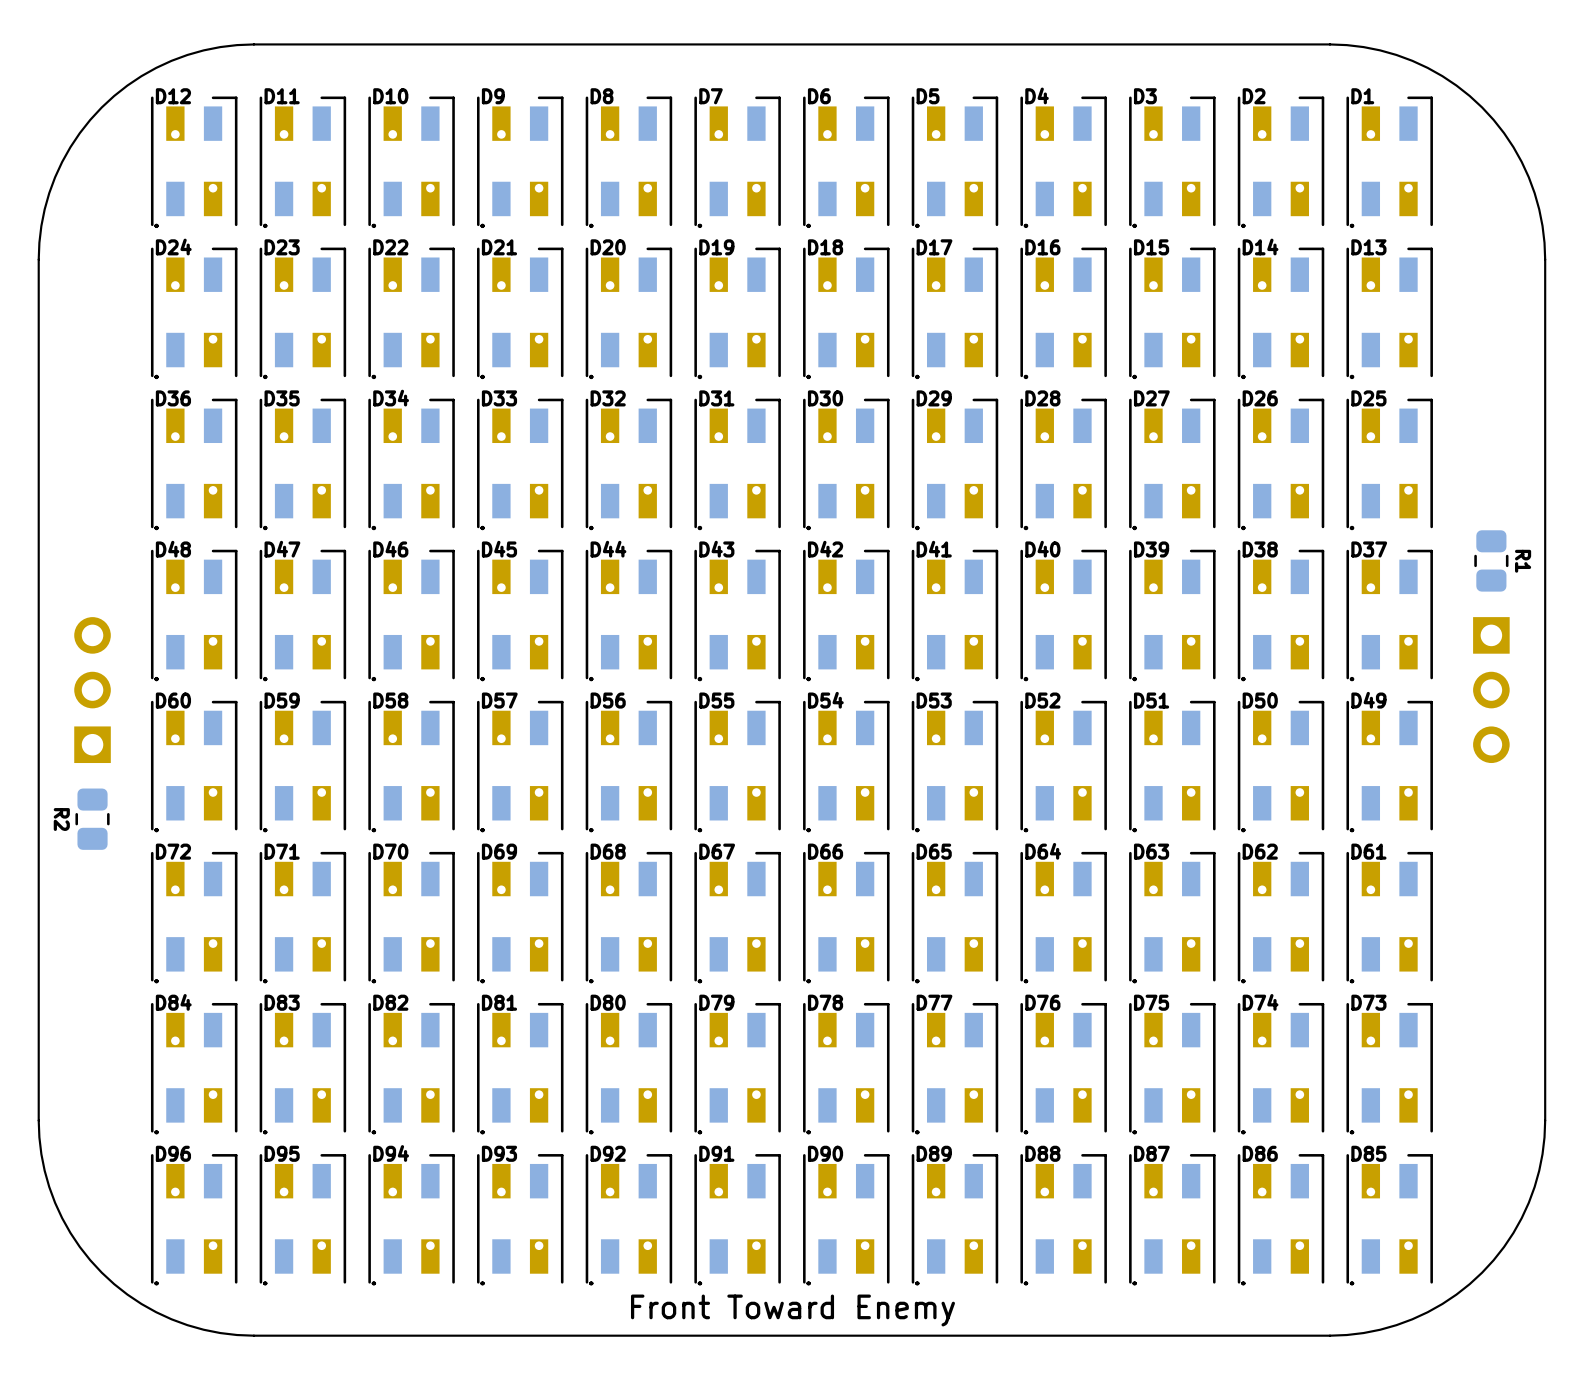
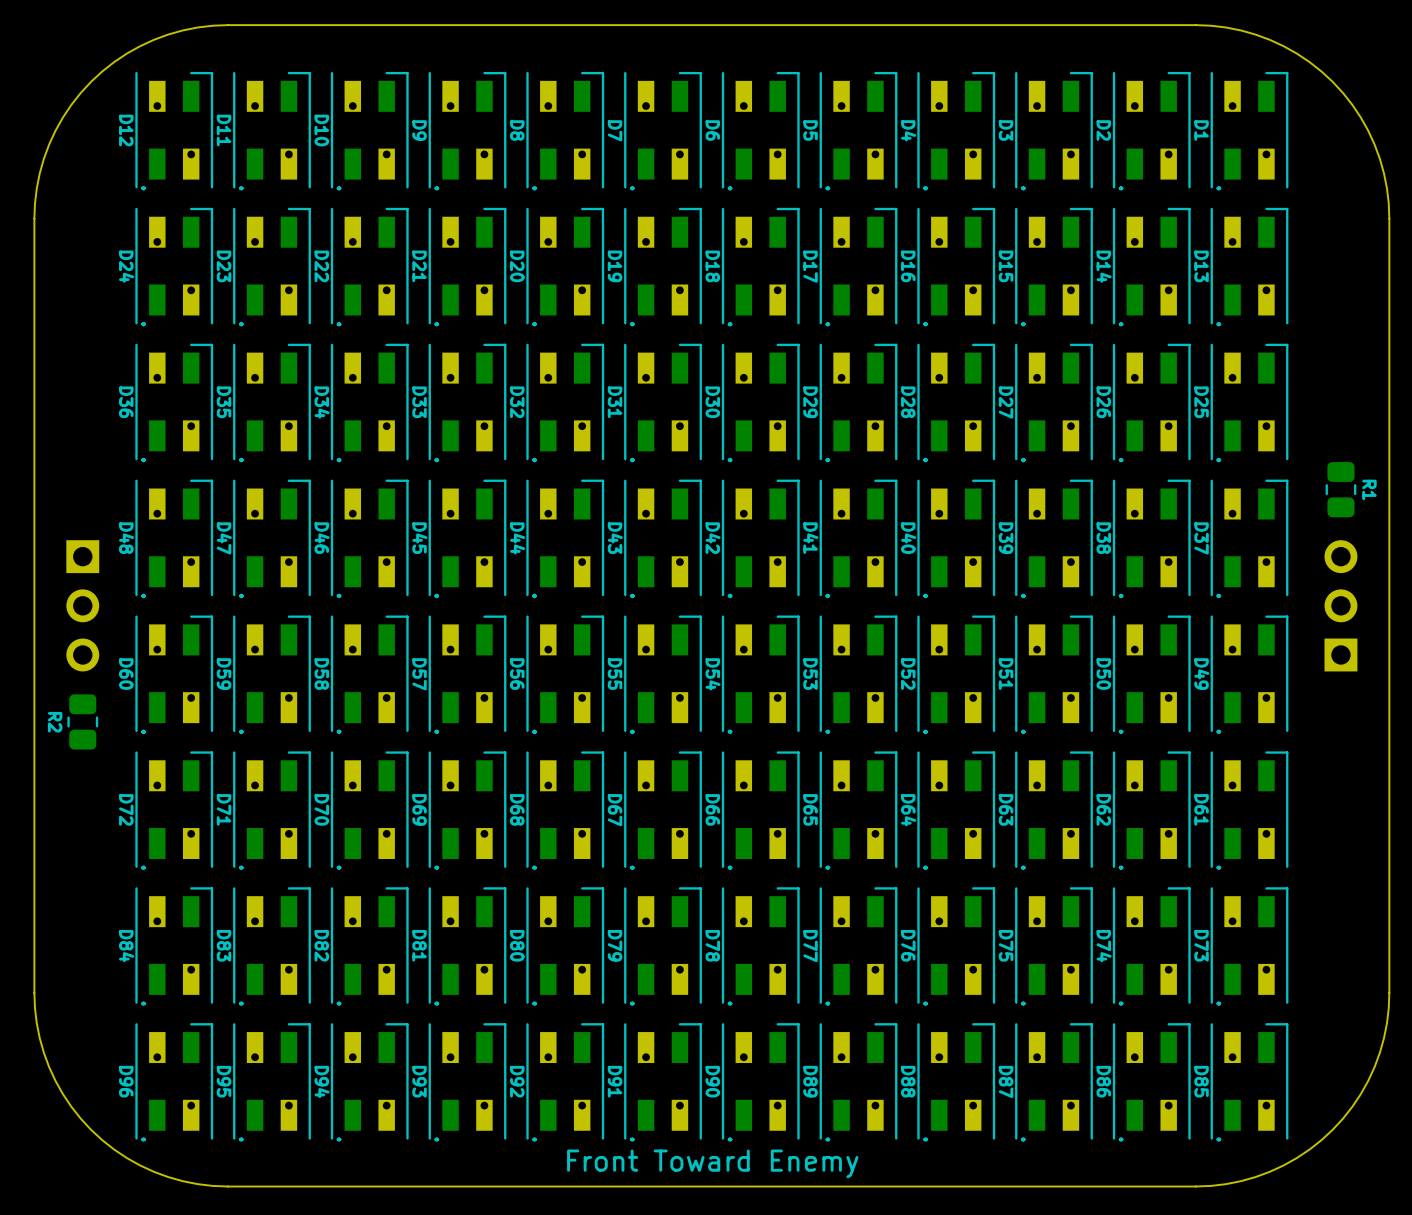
D4 name position: D4 (1037, 95) -> D4 (908, 130)
D12 footprint: [150, 96, 238, 227] -> [135, 71, 214, 189]
D12 name position: D12 (173, 96) -> D12 (126, 130)
D11 footprint: [259, 96, 347, 227] -> [233, 71, 311, 189]
D11 name position: D11 (282, 96) -> D11 (224, 130)
D10 footprint: [368, 96, 455, 227] -> [330, 71, 409, 189]
D10 name position: D10 (390, 96) -> D10 (321, 130)
D9 footprint: [476, 96, 564, 227] -> [428, 71, 507, 189]
D9 name position: D9 (493, 96) -> D9 (419, 130)
D8 footprint: [585, 96, 673, 227] -> [526, 71, 605, 189]
D8 name position: D8 (602, 96) -> D8 (517, 130)
D7 footprint: [694, 96, 781, 227] -> [624, 71, 702, 189]
D7 name position: D7 (710, 96) -> D7 (615, 130)
D6 footprint: [803, 96, 890, 227] -> [721, 71, 800, 189]
D6 name position: D6 (819, 96) -> D6 (712, 130)
D5 footprint: [911, 96, 999, 227] -> [819, 71, 898, 189]
D5 name position: D5 (928, 96) -> D5 (810, 130)
D4 footprint: [1020, 96, 1107, 227] -> [917, 71, 996, 189]
D3 footprint: [1129, 96, 1216, 227] -> [1015, 71, 1093, 189]
D3 name position: D3 (1145, 96) -> D3 (1006, 130)
D2 footprint: [1237, 96, 1325, 227] -> [1112, 71, 1191, 189]
D2 name position: D2 (1254, 96) -> D2 (1103, 130)
D1 footprint: [1346, 96, 1433, 227] -> [1210, 71, 1289, 189]
D1 name position: D1 (1362, 96) -> D1 (1201, 130)
D24 footprint: [150, 247, 238, 378] -> [135, 207, 214, 325]
D24 name position: D24 (173, 247) -> D24 (126, 266)
D23 footprint: [259, 247, 347, 378] -> [233, 207, 311, 325]
D23 name position: D23 (282, 247) -> D23 (224, 266)
D22 footprint: [368, 247, 455, 378] -> [330, 207, 409, 325]
D22 name position: D22 (390, 247) -> D22 (321, 266)
D21 footprint: [476, 247, 564, 378] -> [428, 207, 507, 325]
D21 name position: D21 (499, 247) -> D21 (419, 266)
D20 footprint: [585, 247, 673, 378] -> [526, 207, 605, 325]
D20 name position: D20 (608, 247) -> D20 (517, 266)
D19 footprint: [694, 247, 781, 378] -> [624, 207, 702, 325]
D19 name position: D19 (716, 247) -> D19 (615, 266)
D18 footprint: [803, 247, 890, 378] -> [721, 207, 800, 325]
D18 name position: D18 (825, 247) -> D18 (712, 266)
D17 footprint: [911, 247, 999, 378] -> [819, 207, 898, 325]
D17 name position: D17 (934, 247) -> D17 (810, 266)
D16 footprint: [1020, 247, 1107, 378] -> [917, 207, 996, 325]
D16 name position: D16 (1042, 247) -> D16 (908, 266)
D15 footprint: [1129, 247, 1216, 378] -> [1015, 207, 1093, 325]
D15 name position: D15 (1151, 247) -> D15 (1006, 266)
D14 footprint: [1237, 247, 1325, 378] -> [1112, 207, 1191, 325]
D14 name position: D14 (1260, 247) -> D14 (1104, 266)
D13 footprint: [1346, 247, 1433, 378] -> [1210, 207, 1289, 325]
D13 name position: D13 (1368, 247) -> D13 (1201, 266)
D36 footprint: [150, 398, 238, 529] -> [135, 343, 214, 461]
D36 name position: D36 (173, 398) -> D36 (126, 402)
D35 footprint: [259, 398, 347, 529] -> [233, 343, 311, 461]
D35 name position: D35 (282, 398) -> D35 (224, 402)
D34 footprint: [368, 398, 455, 529] -> [330, 343, 409, 461]
D34 name position: D34 (391, 398) -> D34 (322, 402)
D33 footprint: [476, 398, 564, 529] -> [428, 343, 507, 461]
D33 name position: D33 (499, 398) -> D33 (419, 402)
D32 footprint: [585, 398, 673, 529] -> [526, 343, 605, 461]
D32 name position: D32 (608, 398) -> D32 (517, 402)
D31 footprint: [694, 398, 781, 529] -> [624, 343, 702, 461]
D31 name position: D31 (716, 398) -> D31 (615, 402)
D30 footprint: [803, 398, 890, 529] -> [721, 343, 800, 461]
D30 name position: D30 (825, 398) -> D30 (712, 402)
D29 footprint: [911, 398, 999, 529] -> [819, 343, 898, 461]
D29 name position: D29 (934, 398) -> D29 (810, 402)
D28 footprint: [1020, 398, 1107, 529] -> [917, 343, 996, 461]
D28 name position: D28 (1042, 398) -> D28 (908, 402)
D27 footprint: [1129, 398, 1216, 529] -> [1015, 343, 1093, 461]
D27 name position: D27 (1151, 398) -> D27 (1006, 402)
D26 footprint: [1237, 398, 1325, 529] -> [1112, 343, 1191, 461]
D26 name position: D26 (1260, 398) -> D26 (1103, 402)
D25 footprint: [1346, 398, 1433, 529] -> [1210, 343, 1289, 461]
D25 name position: D25 (1368, 398) -> D25 (1201, 402)
D48 footprint: [150, 549, 238, 680] -> [135, 479, 214, 597]
D48 name position: D48 (173, 549) -> D48 (126, 538)
D47 footprint: [259, 549, 347, 680] -> [233, 479, 311, 597]
D47 name position: D47 (282, 549) -> D47 (224, 538)
D46 footprint: [368, 549, 455, 680] -> [330, 479, 409, 597]
D46 name position: D46 (390, 549) -> D46 (322, 538)
D45 footprint: [476, 549, 564, 680] -> [428, 479, 507, 597]
D45 name position: D45 (499, 549) -> D45 (419, 538)
D44 footprint: [585, 549, 673, 680] -> [526, 479, 605, 597]
D44 name position: D44 (608, 549) -> D44 (517, 538)
D43 footprint: [694, 549, 781, 680] -> [624, 479, 702, 597]
D43 name position: D43 (716, 549) -> D43 (615, 538)
D42 footprint: [803, 549, 890, 680] -> [721, 479, 800, 597]
D42 name position: D42 (825, 549) -> D42 (713, 538)
D41 footprint: [911, 549, 999, 680] -> [819, 479, 898, 597]
D41 name position: D41 (934, 549) -> D41 (810, 538)
D40 footprint: [1020, 549, 1107, 680] -> [917, 479, 996, 597]
D40 name position: D40 (1042, 549) -> D40 (908, 538)
D39 footprint: [1129, 549, 1216, 680] -> [1015, 479, 1093, 597]
D39 name position: D39 (1151, 549) -> D39 (1006, 538)
D38 footprint: [1237, 549, 1325, 680] -> [1112, 479, 1191, 597]
D38 name position: D38 (1260, 549) -> D38 (1103, 538)
D37 footprint: [1346, 549, 1433, 680] -> [1210, 479, 1289, 597]
D37 name position: D37 (1369, 549) -> D37 (1201, 538)
part rotation: 0° (92, 690) -> 180° (82, 605)
part rotation: 0° (1491, 690) -> 180° (1340, 605)
D60 footprint: [150, 700, 238, 831] -> [135, 615, 214, 733]
D60 name position: D60 (173, 700) -> D60 (126, 674)
D59 footprint: [259, 700, 347, 831] -> [233, 615, 311, 733]
D59 name position: D59 (282, 700) -> D59 (224, 674)
D58 footprint: [368, 700, 455, 831] -> [330, 615, 409, 733]
D58 name position: D58 (390, 700) -> D58 (321, 674)
D57 footprint: [476, 700, 564, 831] -> [428, 615, 507, 733]
D57 name position: D57 (499, 700) -> D57 (419, 674)
D56 footprint: [585, 700, 673, 831] -> [526, 615, 605, 733]
D56 name position: D56 (608, 700) -> D56 (517, 674)
D55 footprint: [694, 700, 781, 831] -> [624, 615, 702, 733]
D55 name position: D55 (716, 700) -> D55 (615, 674)
D54 footprint: [803, 700, 890, 831] -> [721, 615, 800, 733]
D54 name position: D54 (825, 700) -> D54 (713, 674)
D53 footprint: [911, 700, 999, 831] -> [819, 615, 898, 733]
D53 name position: D53 (934, 700) -> D53 (810, 674)
D52 footprint: [1020, 700, 1107, 831] -> [917, 615, 996, 733]
D52 name position: D52 (1042, 700) -> D52 (908, 674)
D51 footprint: [1129, 700, 1216, 831] -> [1015, 615, 1093, 733]
D51 name position: D51 (1151, 700) -> D51 (1006, 674)
D50 footprint: [1237, 700, 1325, 831] -> [1112, 615, 1191, 733]
D50 name position: D50 (1260, 700) -> D50 (1103, 674)
D49 footprint: [1346, 700, 1433, 831] -> [1210, 615, 1289, 733]
D49 name position: D49 (1368, 700) -> D49 (1201, 674)
D72 footprint: [150, 851, 238, 982] -> [135, 751, 214, 868]
D72 name position: D72 (173, 851) -> D72 (126, 809)
D71 footprint: [259, 851, 347, 982] -> [233, 751, 311, 868]
D71 name position: D71 (282, 851) -> D71 (224, 809)
D70 footprint: [368, 851, 455, 982] -> [330, 751, 409, 868]
D70 name position: D70 (390, 851) -> D70 (321, 809)
D69 footprint: [476, 851, 564, 982] -> [428, 751, 507, 868]
D69 name position: D69 (499, 851) -> D69 (419, 809)
D68 footprint: [585, 851, 673, 982] -> [526, 751, 605, 868]
D68 name position: D68 (608, 851) -> D68 (517, 809)
D67 footprint: [694, 851, 781, 982] -> [624, 751, 702, 868]
D67 name position: D67 (717, 851) -> D67 (615, 810)
D66 footprint: [803, 851, 890, 982] -> [721, 751, 800, 868]
D66 name position: D66 (825, 851) -> D66 (712, 809)
D65 footprint: [911, 851, 999, 982] -> [819, 751, 898, 868]
D65 name position: D65 (934, 851) -> D65 (810, 809)
D64 footprint: [1020, 851, 1107, 982] -> [917, 751, 996, 868]
D64 name position: D64 (1043, 851) -> D64 (908, 810)
D63 footprint: [1129, 851, 1216, 982] -> [1015, 751, 1093, 868]
D63 name position: D63 (1151, 851) -> D63 (1006, 809)
D62 footprint: [1237, 851, 1325, 982] -> [1112, 751, 1191, 868]
D62 name position: D62 (1260, 851) -> D62 (1103, 809)
D61 footprint: [1346, 851, 1433, 982] -> [1210, 751, 1289, 868]
D61 name position: D61 (1368, 851) -> D61 (1201, 809)
D84 footprint: [150, 1002, 238, 1133] -> [135, 887, 214, 1004]
D84 name position: D84 (173, 1002) -> D84 (126, 946)
D83 footprint: [259, 1002, 347, 1133] -> [233, 887, 311, 1004]
D83 name position: D83 (282, 1002) -> D83 (224, 945)
D82 footprint: [368, 1002, 455, 1133] -> [330, 887, 409, 1004]
D82 name position: D82 (390, 1002) -> D82 (321, 945)
D81 footprint: [476, 1002, 564, 1133] -> [428, 887, 507, 1004]
D81 name position: D81 (499, 1002) -> D81 (419, 945)
D80 footprint: [585, 1002, 673, 1133] -> [526, 887, 605, 1004]
D80 name position: D80 (608, 1002) -> D80 (517, 945)
D79 footprint: [694, 1002, 781, 1133] -> [624, 887, 702, 1004]
D79 name position: D79 (716, 1002) -> D79 (615, 945)
D78 footprint: [803, 1002, 890, 1133] -> [721, 887, 800, 1004]
D78 name position: D78 (825, 1002) -> D78 (712, 945)
D77 footprint: [911, 1002, 999, 1133] -> [819, 887, 898, 1004]
D77 name position: D77 (934, 1002) -> D77 (810, 946)
D76 footprint: [1020, 1002, 1107, 1133] -> [917, 887, 996, 1004]
D76 name position: D76 (1042, 1002) -> D76 (908, 945)
D75 footprint: [1129, 1002, 1216, 1133] -> [1015, 887, 1093, 1004]
D75 name position: D75 (1151, 1002) -> D75 (1006, 945)
D74 footprint: [1237, 1002, 1325, 1133] -> [1112, 887, 1191, 1004]
D74 name position: D74 (1260, 1002) -> D74 (1104, 946)
D73 footprint: [1346, 1002, 1433, 1133] -> [1210, 887, 1289, 1004]
D73 name position: D73 (1368, 1002) -> D73 (1201, 945)
D96 name position: D96 (173, 1153) -> D96 (126, 1081)
D95 name position: D95 (282, 1153) -> D95 (224, 1081)
D94 name position: D94 (391, 1153) -> D94 (322, 1081)
D93 name position: D93 (499, 1153) -> D93 (419, 1081)
D92 name position: D92 (608, 1153) -> D92 (517, 1081)
D91 name position: D91 (716, 1153) -> D91 (615, 1081)
D90 name position: D90 (825, 1153) -> D90 (712, 1081)
D89 name position: D89 (934, 1153) -> D89 (810, 1081)
D88 name position: D88 (1042, 1153) -> D88 (908, 1081)
D87 name position: D87 (1151, 1153) -> D87 (1006, 1081)
D86 name position: D86 (1260, 1153) -> D86 (1103, 1081)
D85 name position: D85 (1368, 1153) -> D85 (1201, 1081)
D96 footprint: [150, 1154, 238, 1284] -> [135, 1023, 214, 1140]
D95 footprint: [259, 1154, 347, 1284] -> [233, 1023, 311, 1140]
D94 footprint: [368, 1154, 455, 1284] -> [330, 1023, 409, 1140]
D93 footprint: [476, 1154, 564, 1284] -> [428, 1023, 507, 1140]
D92 footprint: [585, 1154, 673, 1284] -> [526, 1023, 605, 1140]
D91 footprint: [694, 1154, 781, 1284] -> [624, 1023, 702, 1140]
D90 footprint: [803, 1154, 890, 1284] -> [721, 1023, 800, 1140]
D89 footprint: [911, 1154, 999, 1284] -> [819, 1023, 898, 1140]
D88 footprint: [1020, 1154, 1107, 1284] -> [917, 1023, 996, 1140]
D87 footprint: [1129, 1154, 1216, 1284] -> [1015, 1023, 1093, 1140]
D86 footprint: [1237, 1154, 1325, 1284] -> [1112, 1023, 1191, 1140]
D85 footprint: [1346, 1154, 1433, 1284] -> [1210, 1023, 1289, 1140]

